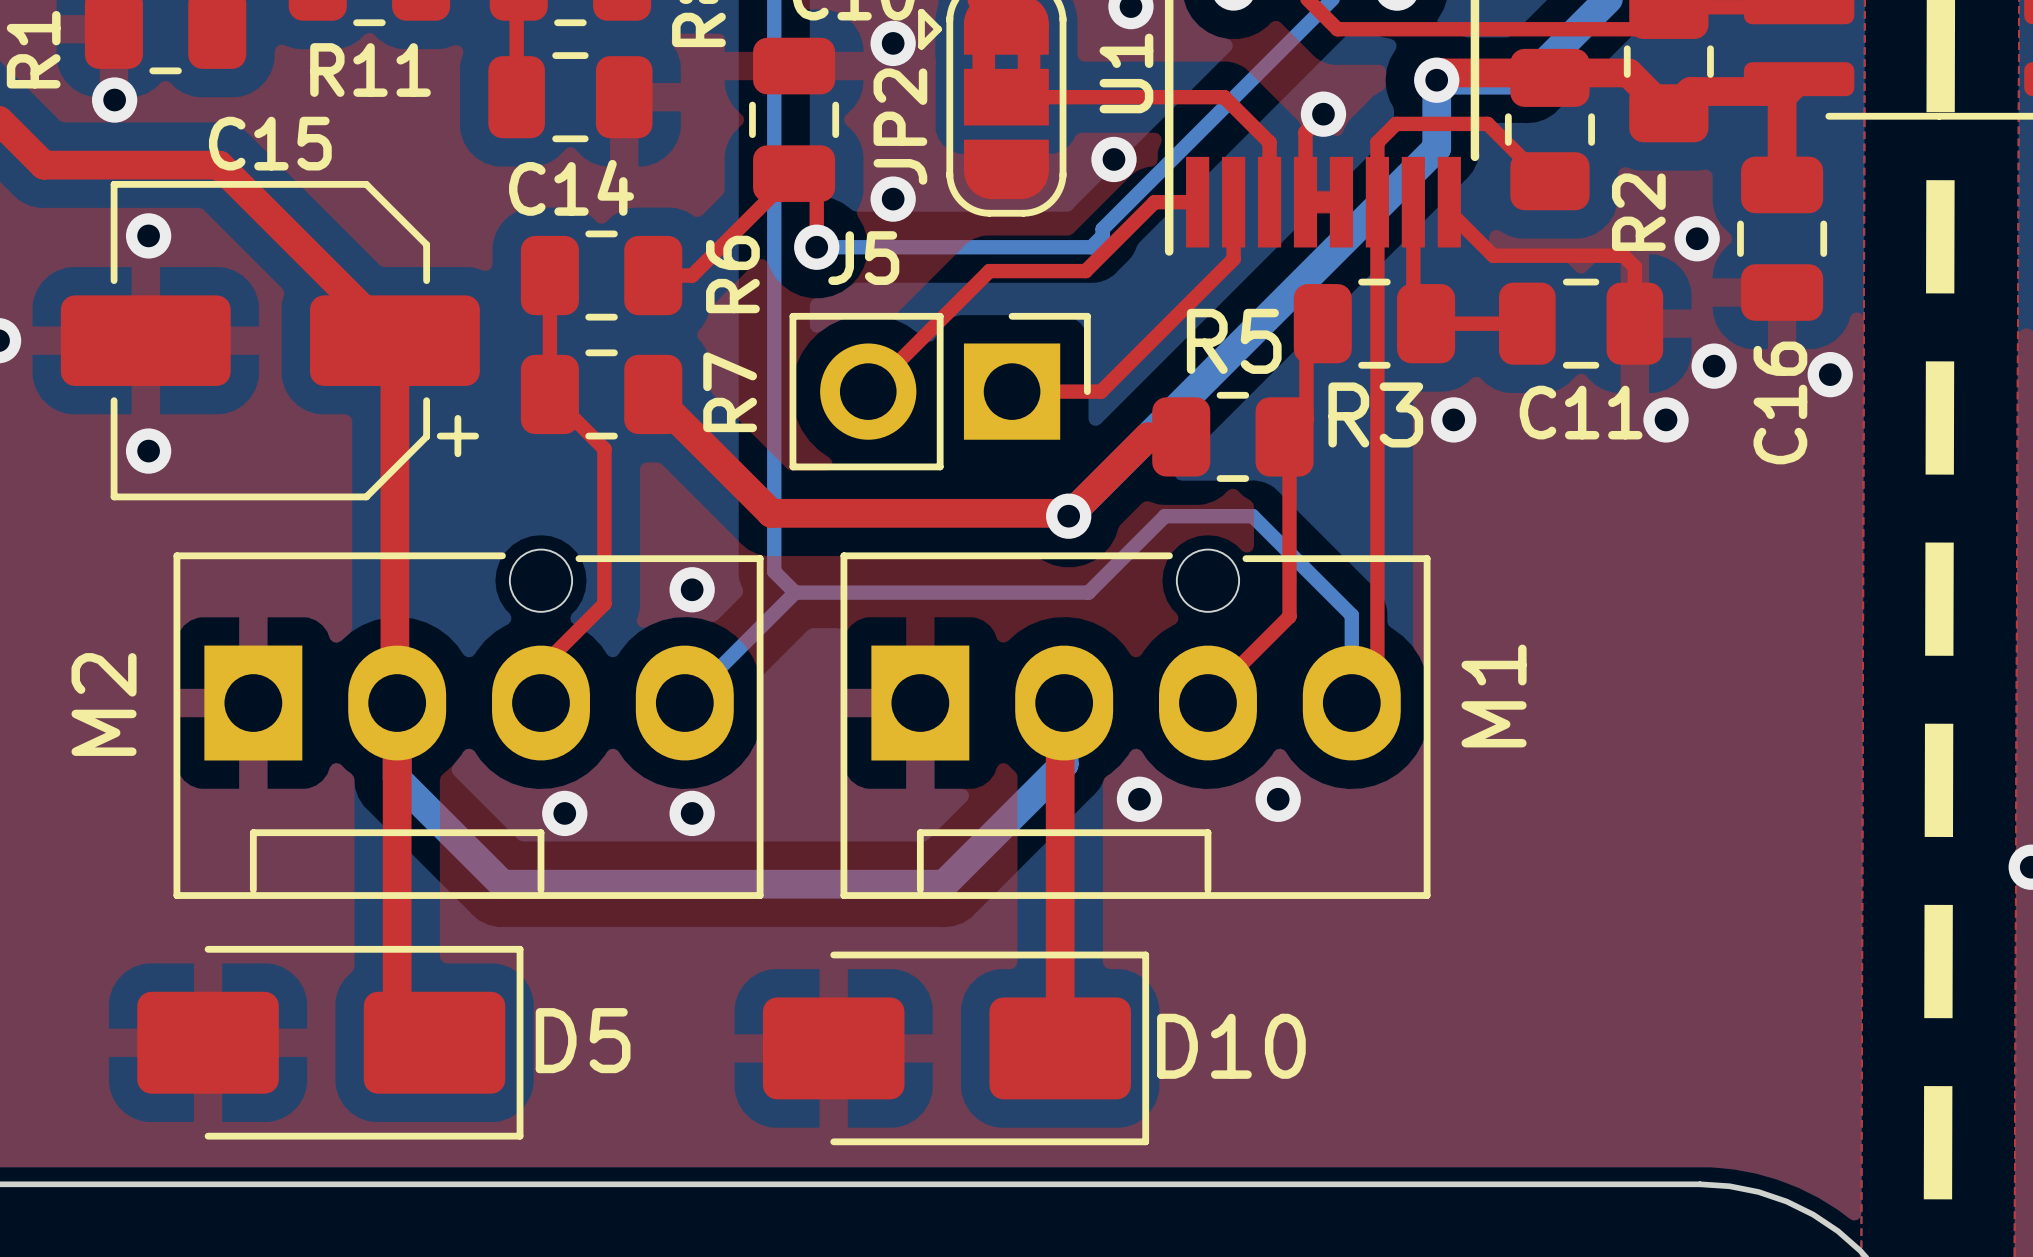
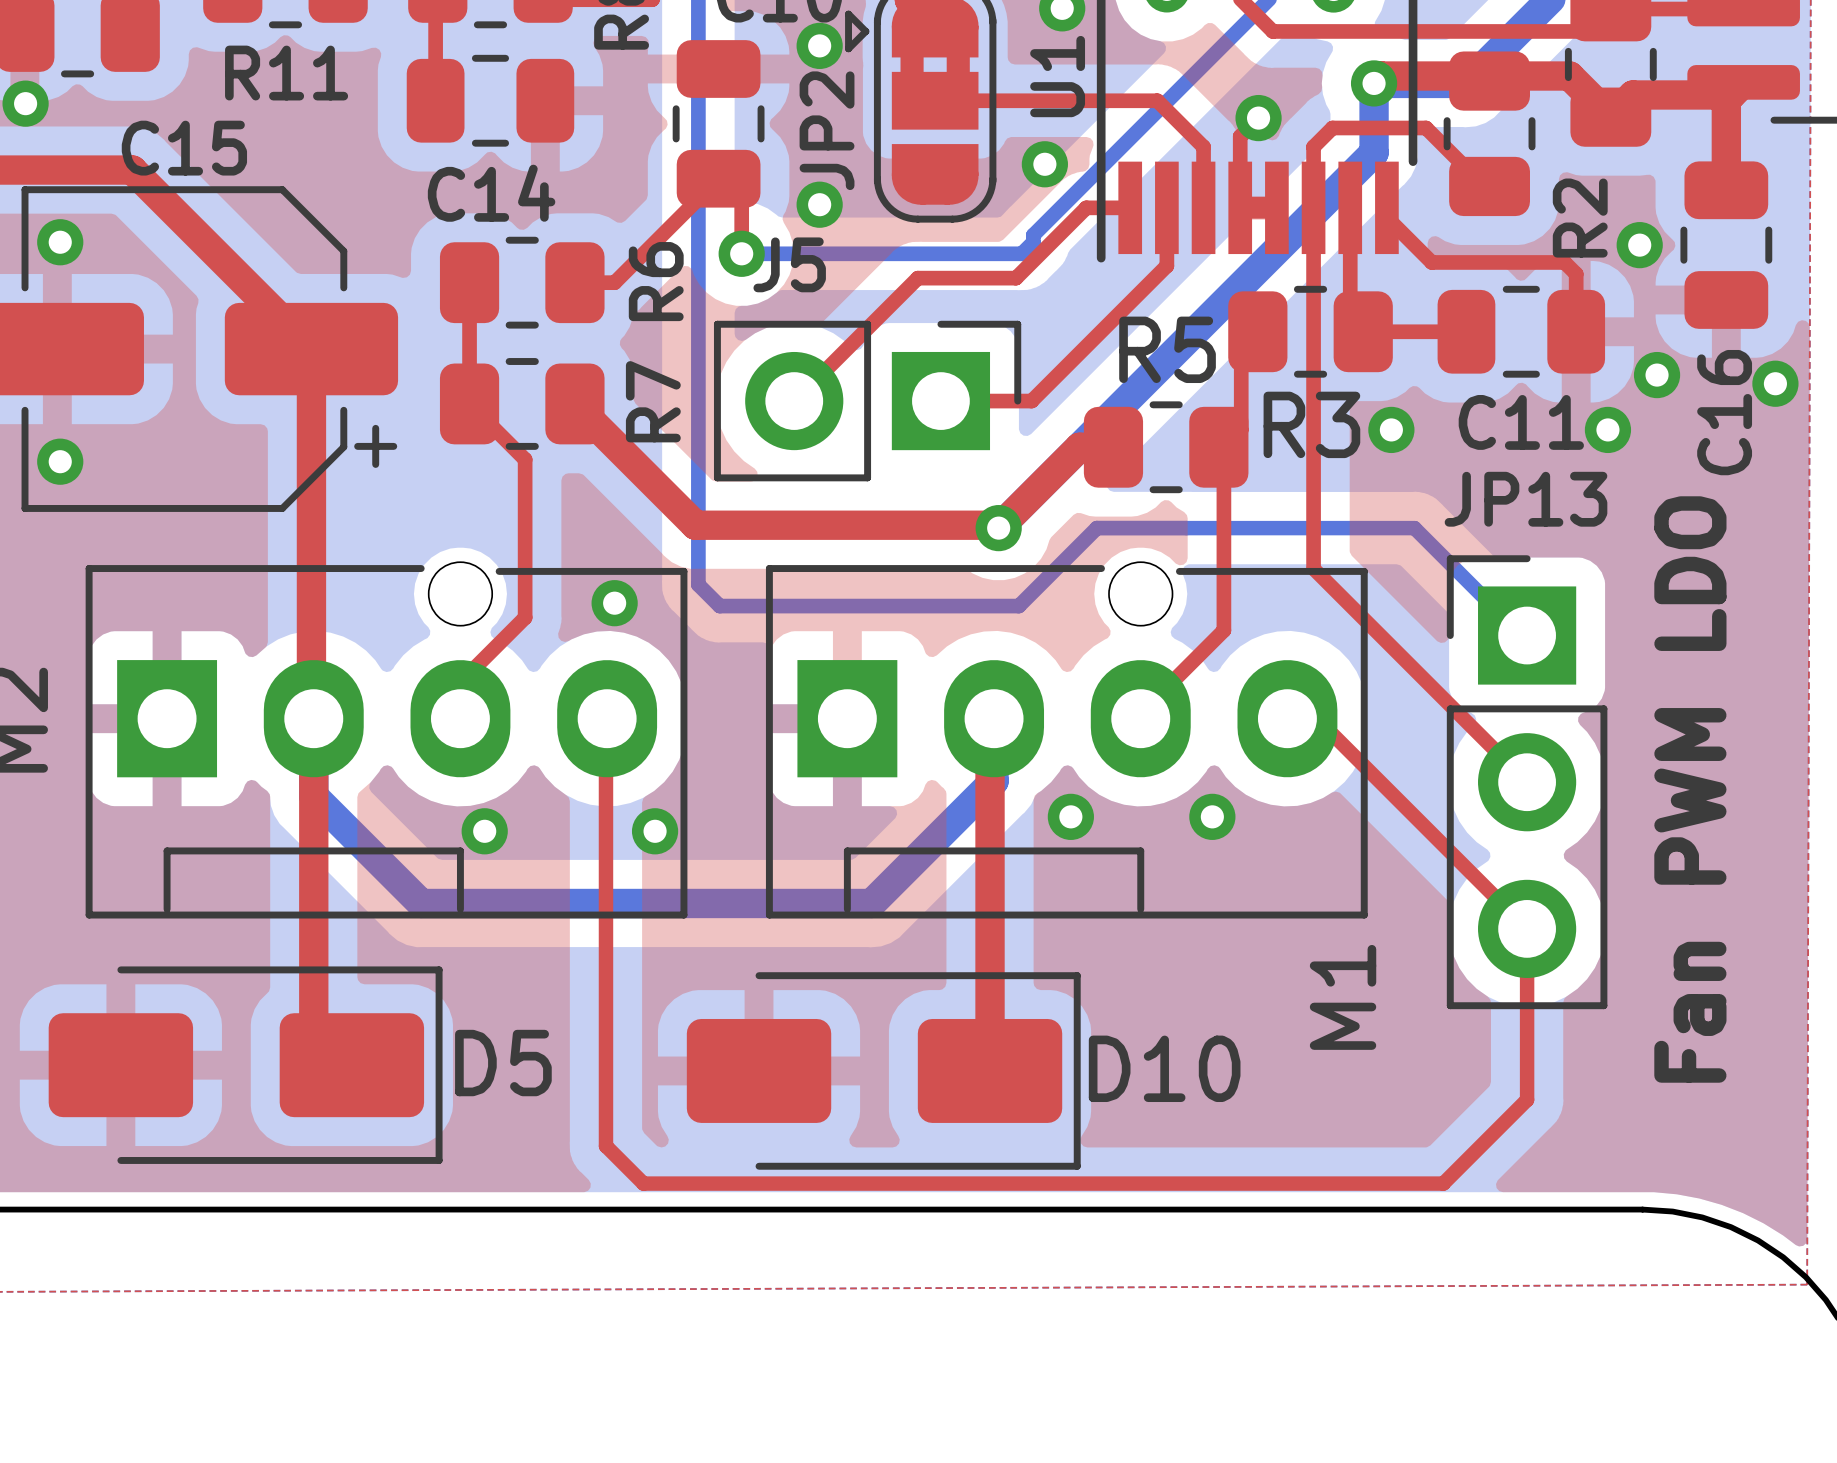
bottom track: (1252, 516) (1351, 615) (1351, 703) -> (1186, 528) (1414, 528) (1521, 635) (1527, 635)
top track: (1377, 555) (1377, 677) -> (1313, 568) (1527, 782)
bottom track: (795, 592) (684, 703) -> none
M1 name position: M1 (1494, 696) -> M1 (1343, 997)
top track: none -> (607, 718) (605, 1146) (643, 1183) (1443, 1183) (1527, 1099) (1527, 928) (1316, 718) (1287, 718)
JP13: none -> (1527, 782)
text: none -> Fan PWM LDO (1690, 789)
via position: (692, 813) -> (655, 831)

